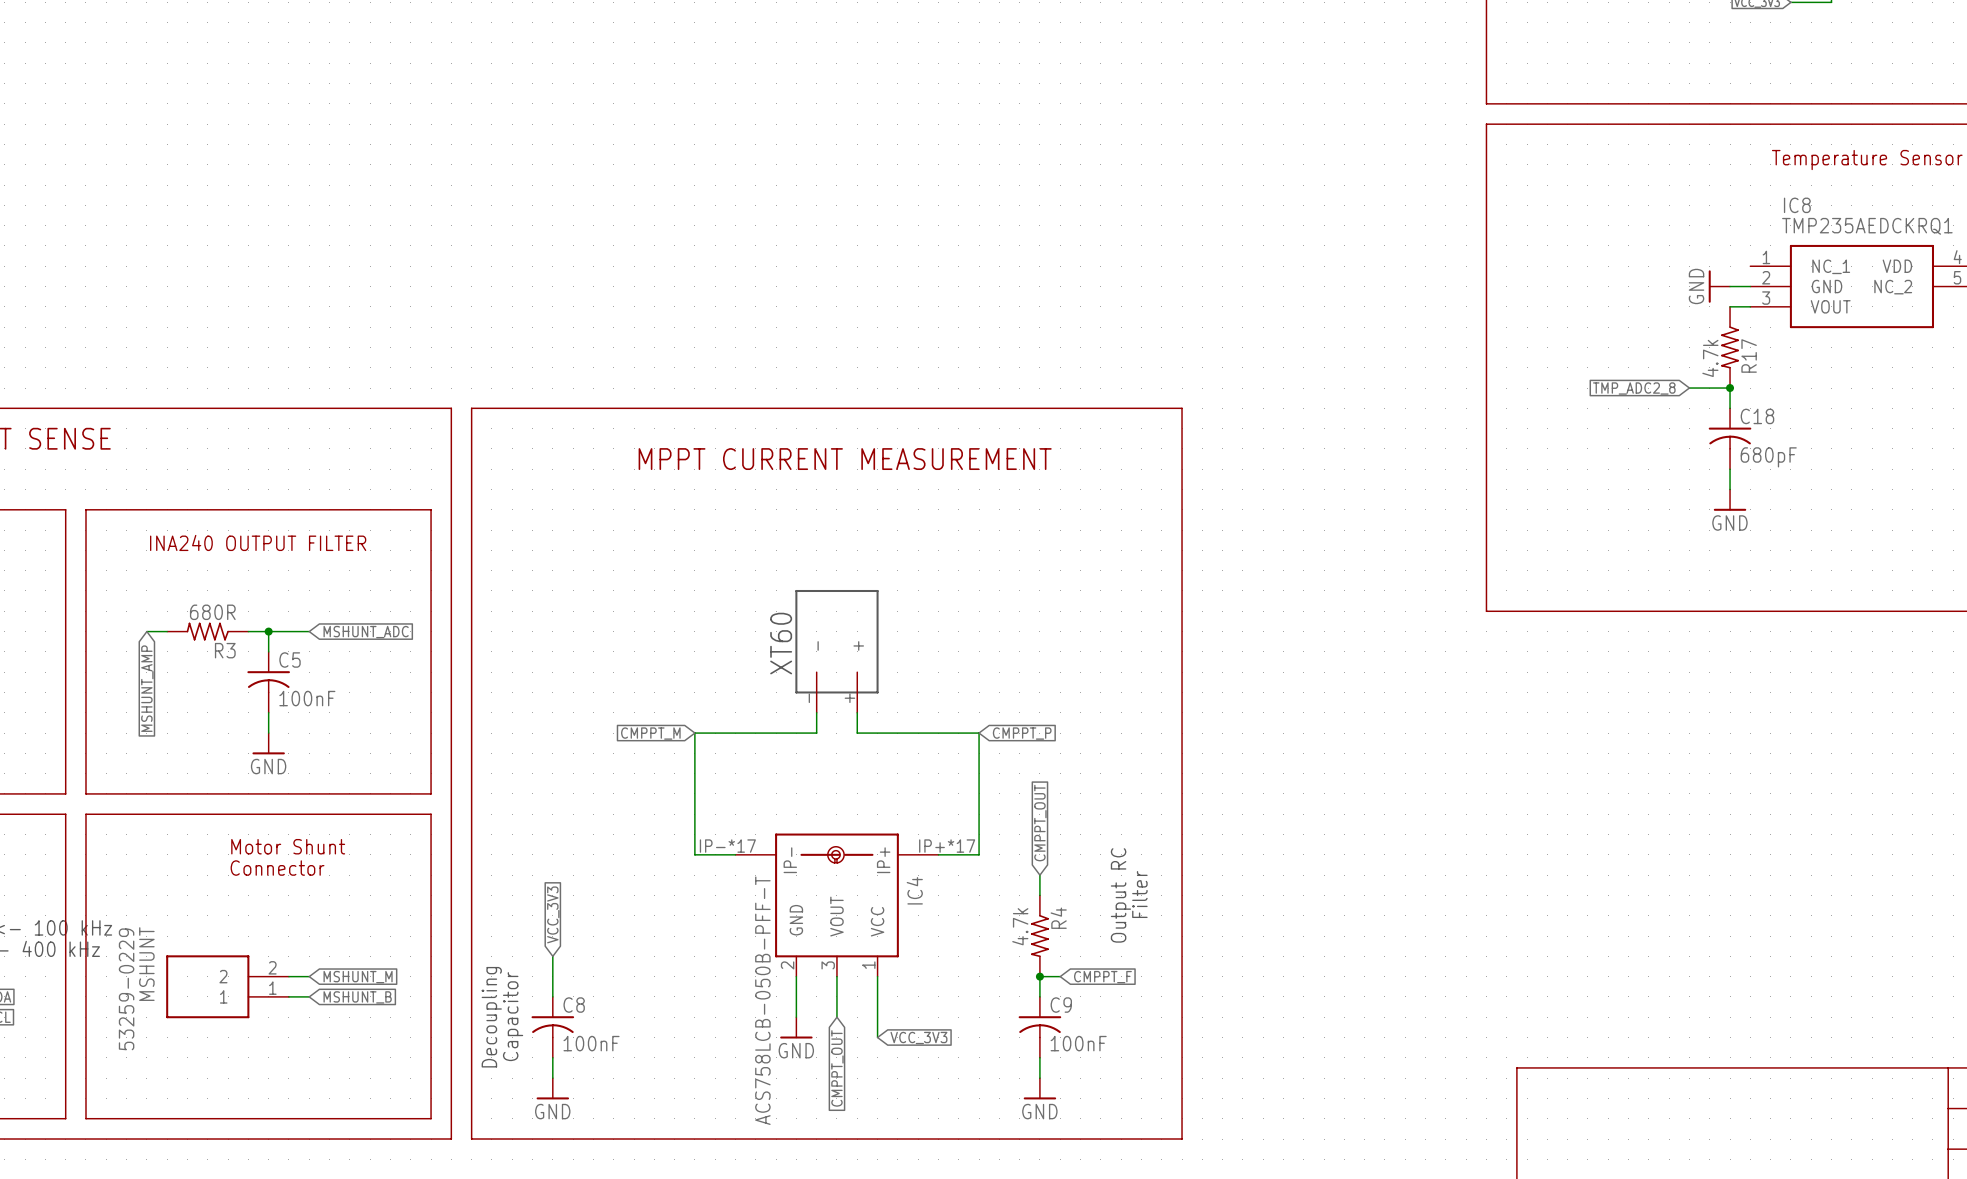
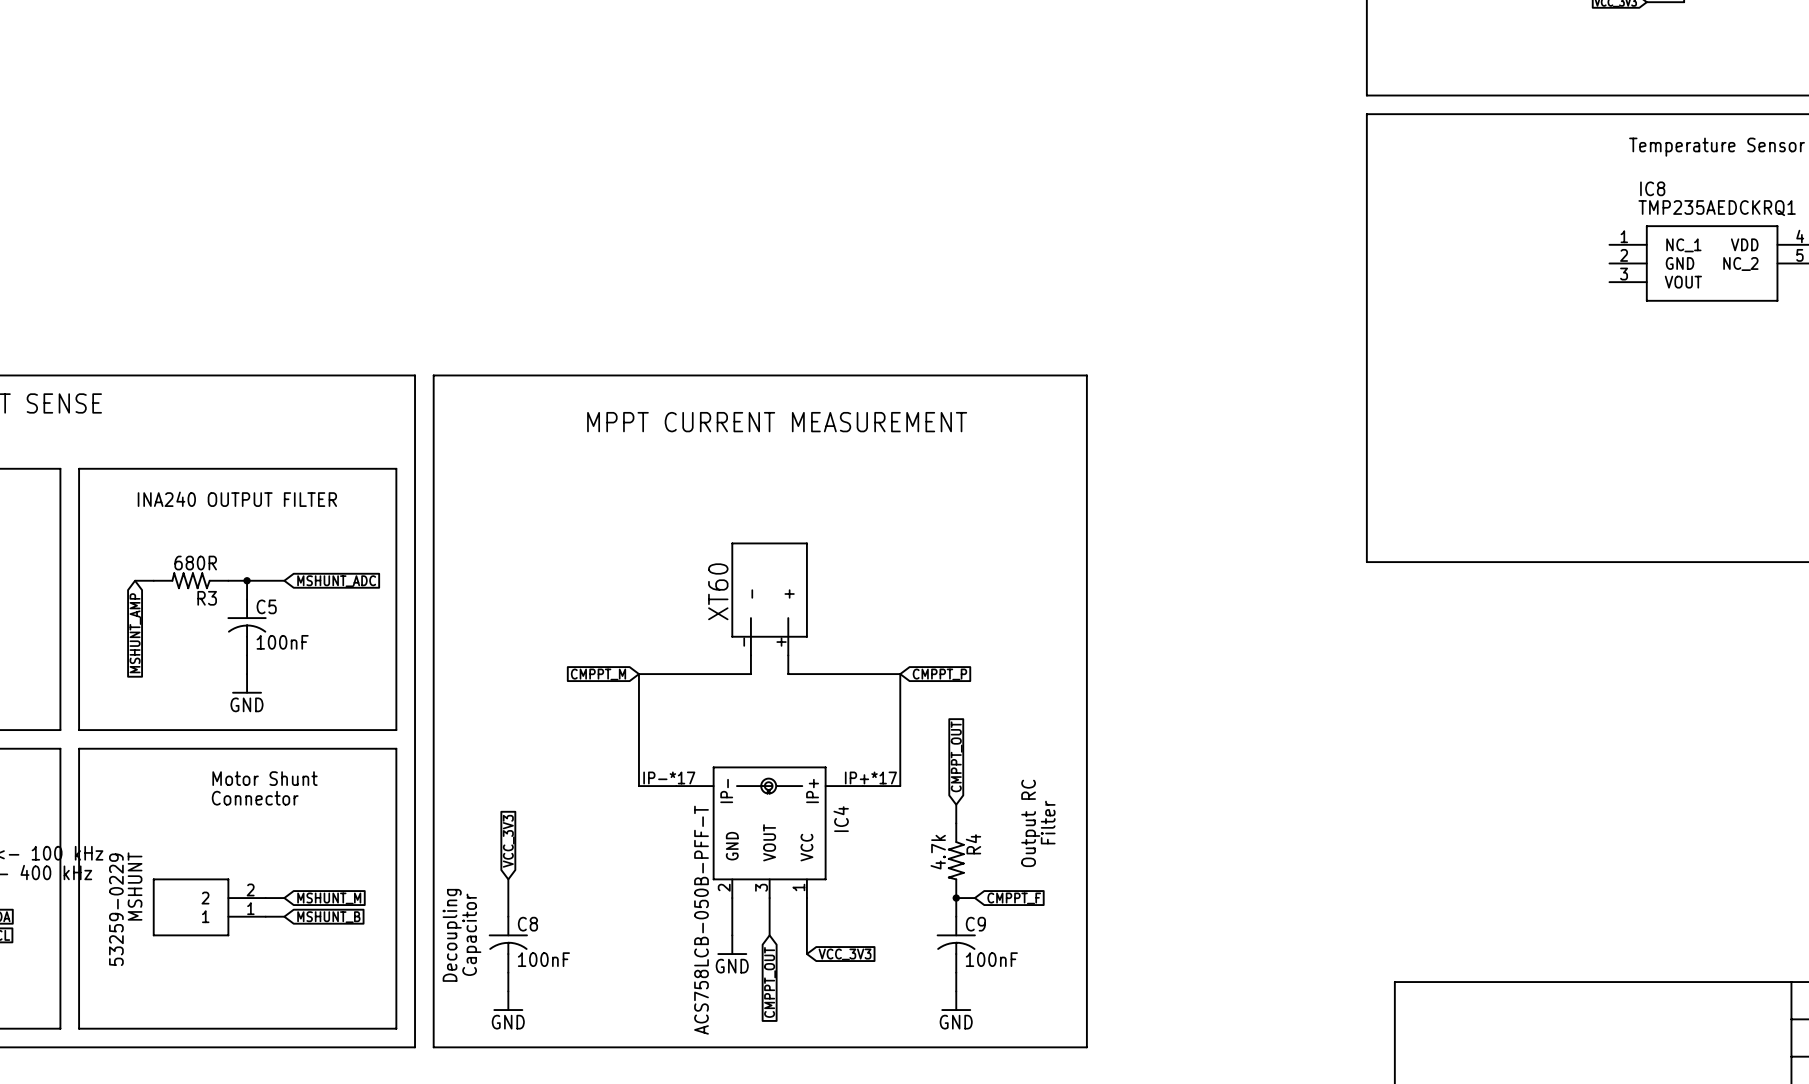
power symbol: GND (1719, 286) -> none
wire: (1730, 286) (1750, 286) -> none
wire: (1730, 306) (1750, 306) -> none
R17: 4.7k (1730, 347) -> none
global label: TMP_ADC2_8 (1634, 388) -> none
wire: (1689, 388) (1730, 388) (1730, 408) -> none
junction: (1730, 388) -> none
C18: 680pF (1730, 438) -> none
wire: (1730, 469) (1730, 489) -> none
power symbol: GND (1730, 500) -> none

